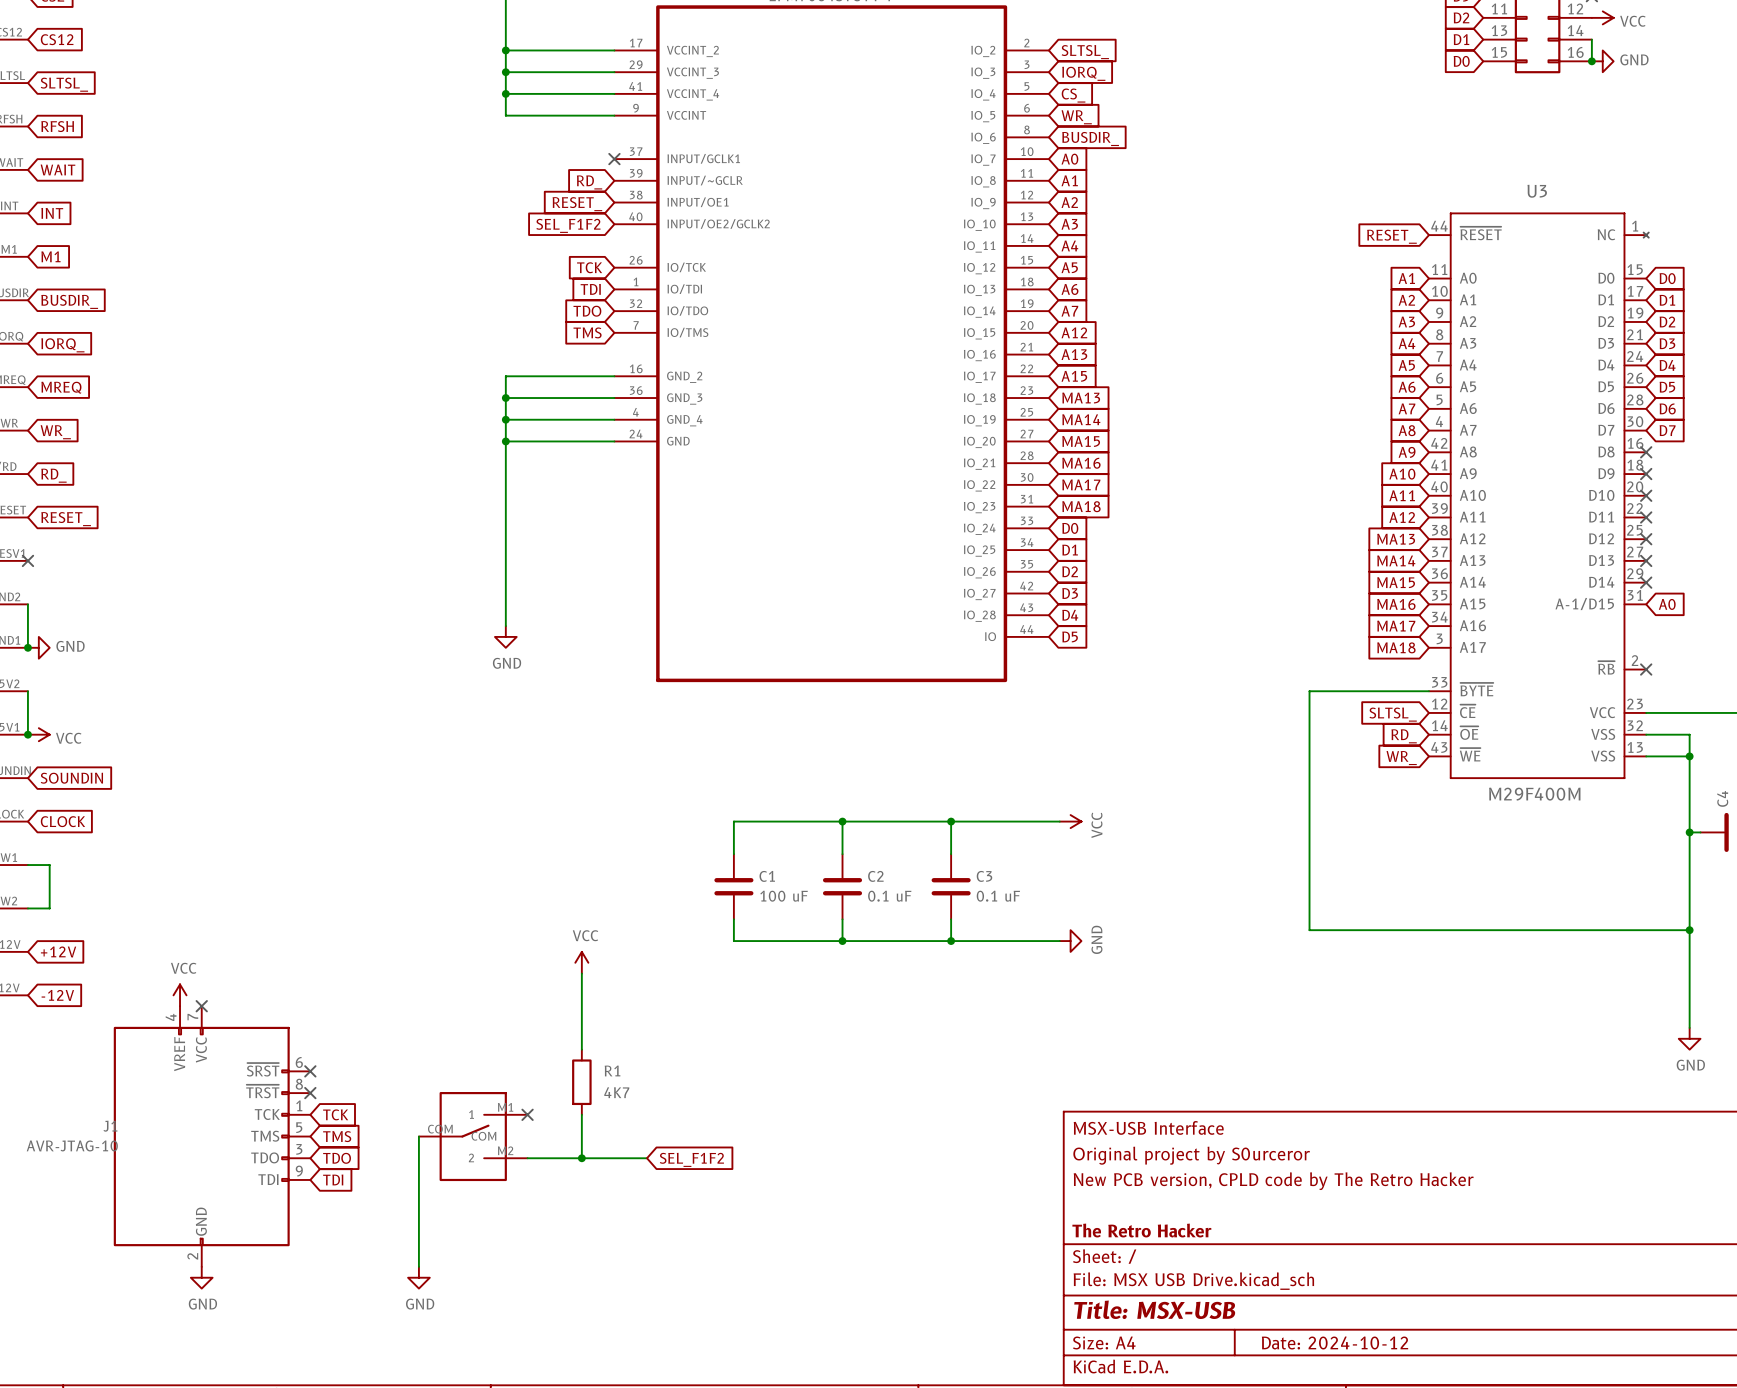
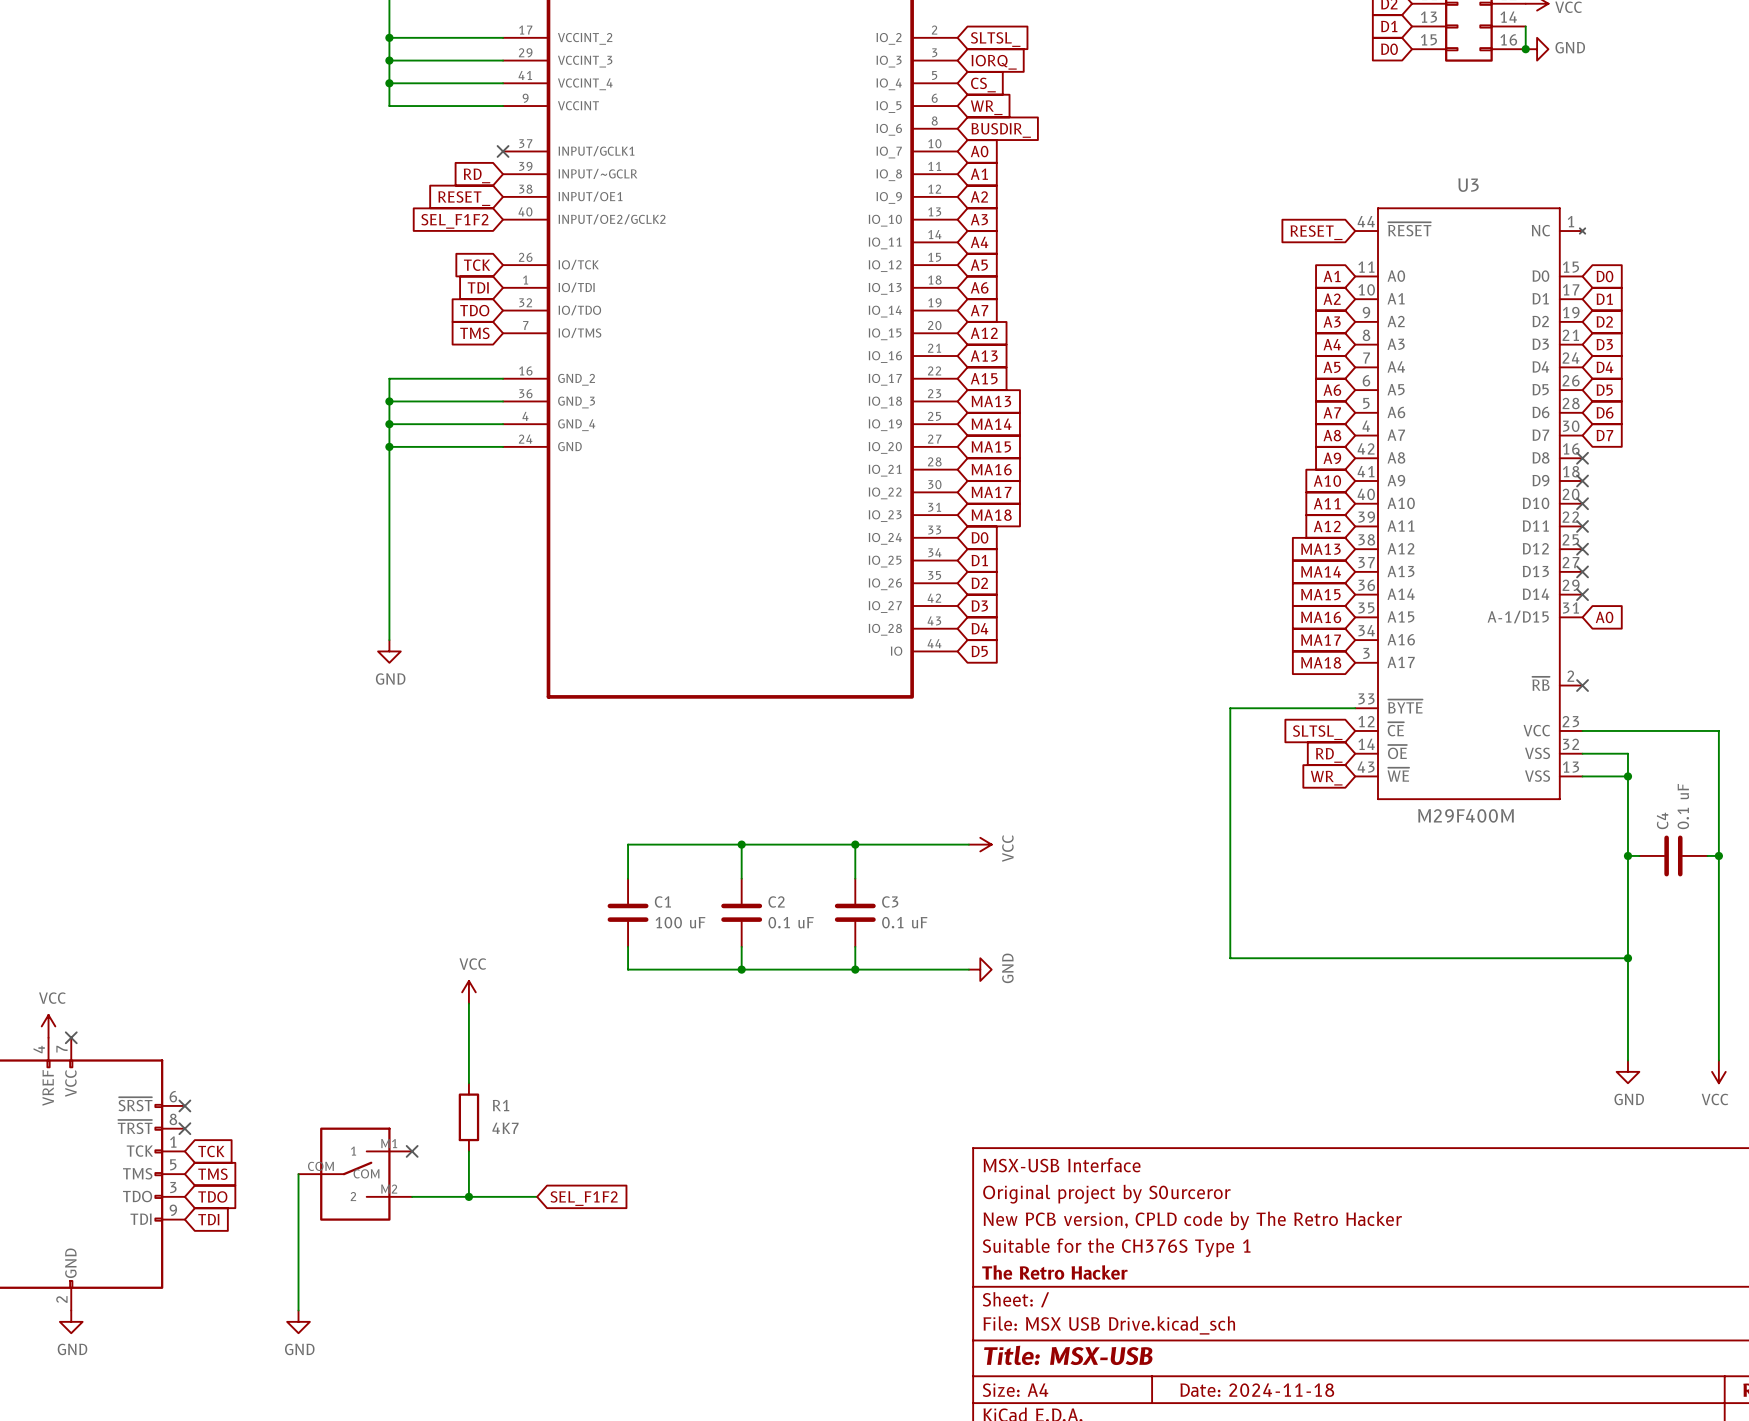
title block: none -> Suitable for the CH376S Type 1 (1116, 1247)
title block: Date: 2024-10-12 (1335, 1342) -> Date: 2024-11-18 (1257, 1390)

